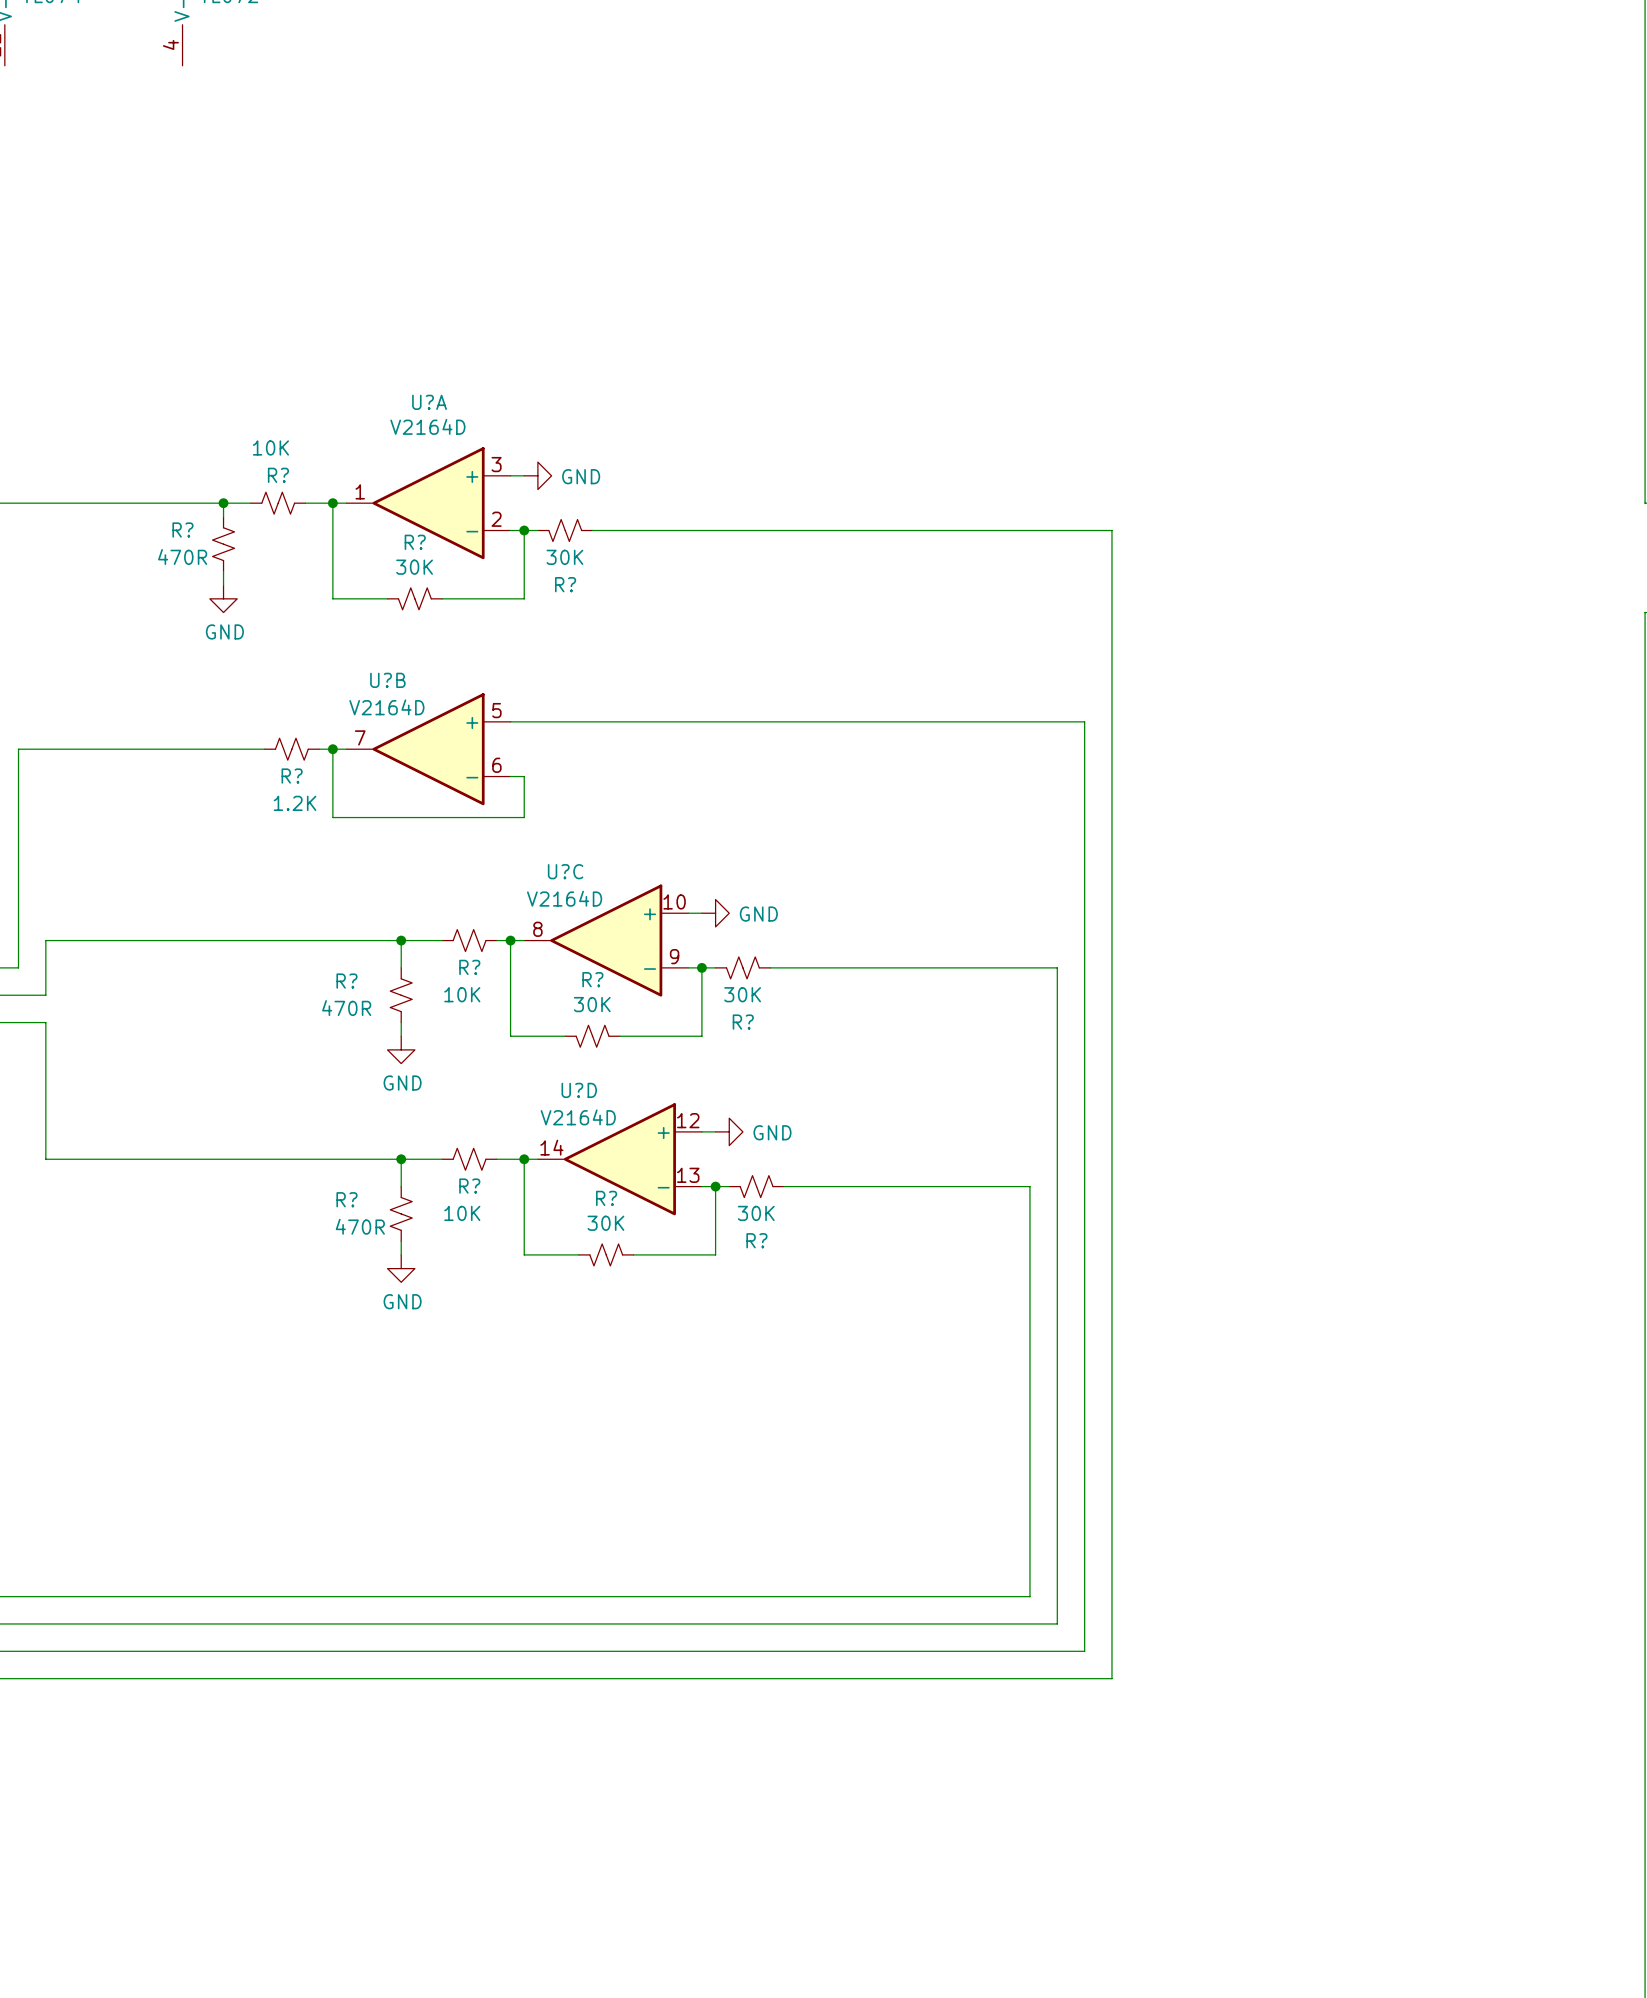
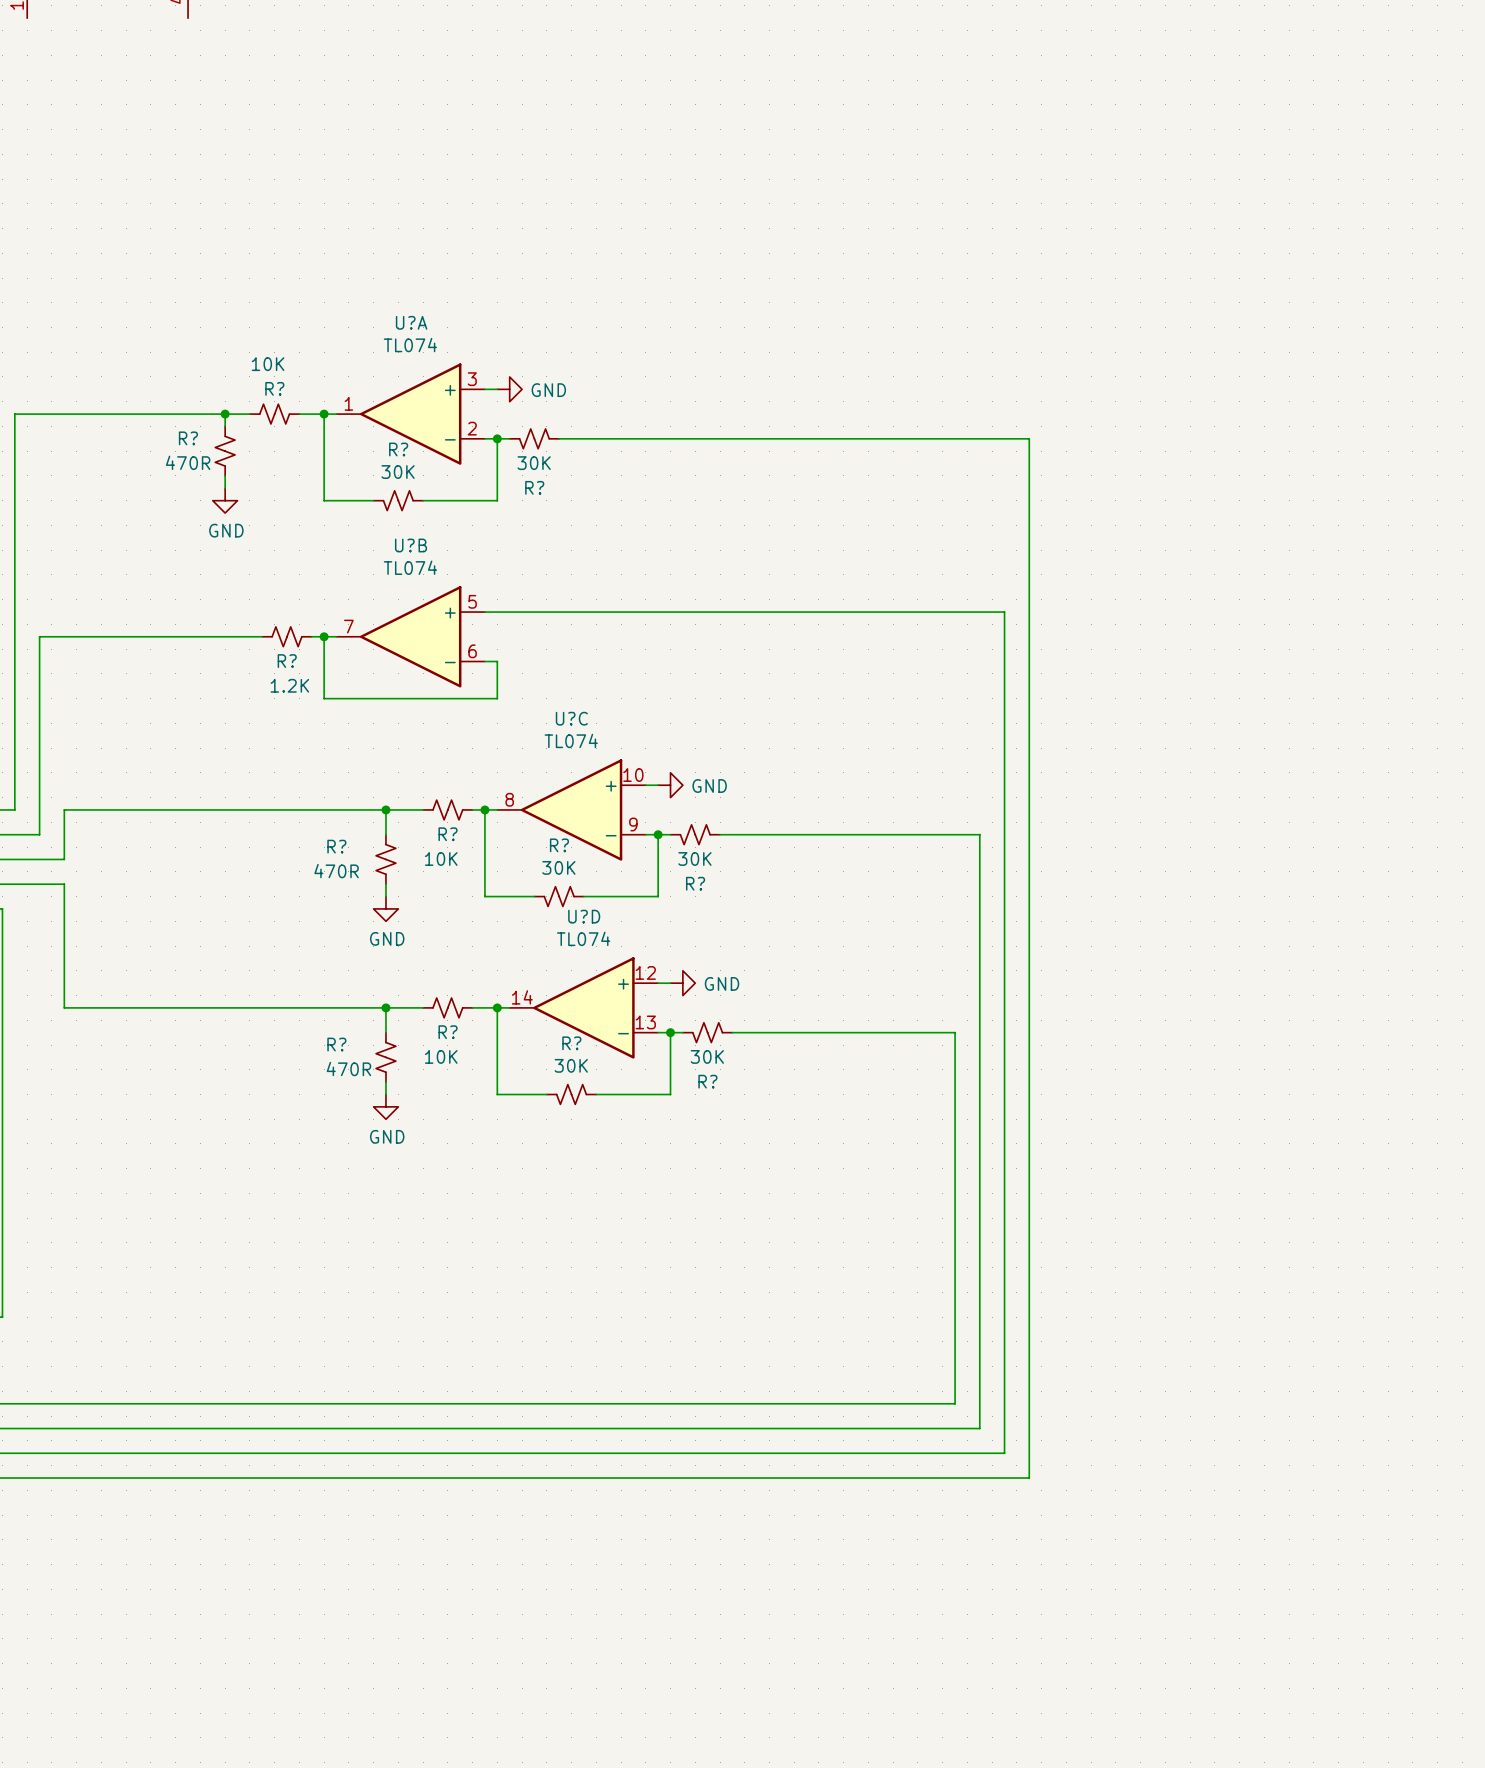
U?A value: V2164D (427, 426) -> TL074 (410, 345)
U?B name position: U?B (387, 680) -> U?B (411, 545)
U?B value: V2164D (386, 707) -> TL074 (410, 567)
U?C name position: U?C (565, 871) -> U?C (571, 718)
U?C value: V2164D (564, 898) -> TL074 (571, 740)
U?D name position: U?D (579, 1090) -> U?D (584, 916)
U?D value: V2164D (578, 1117) -> TL074 (583, 938)

